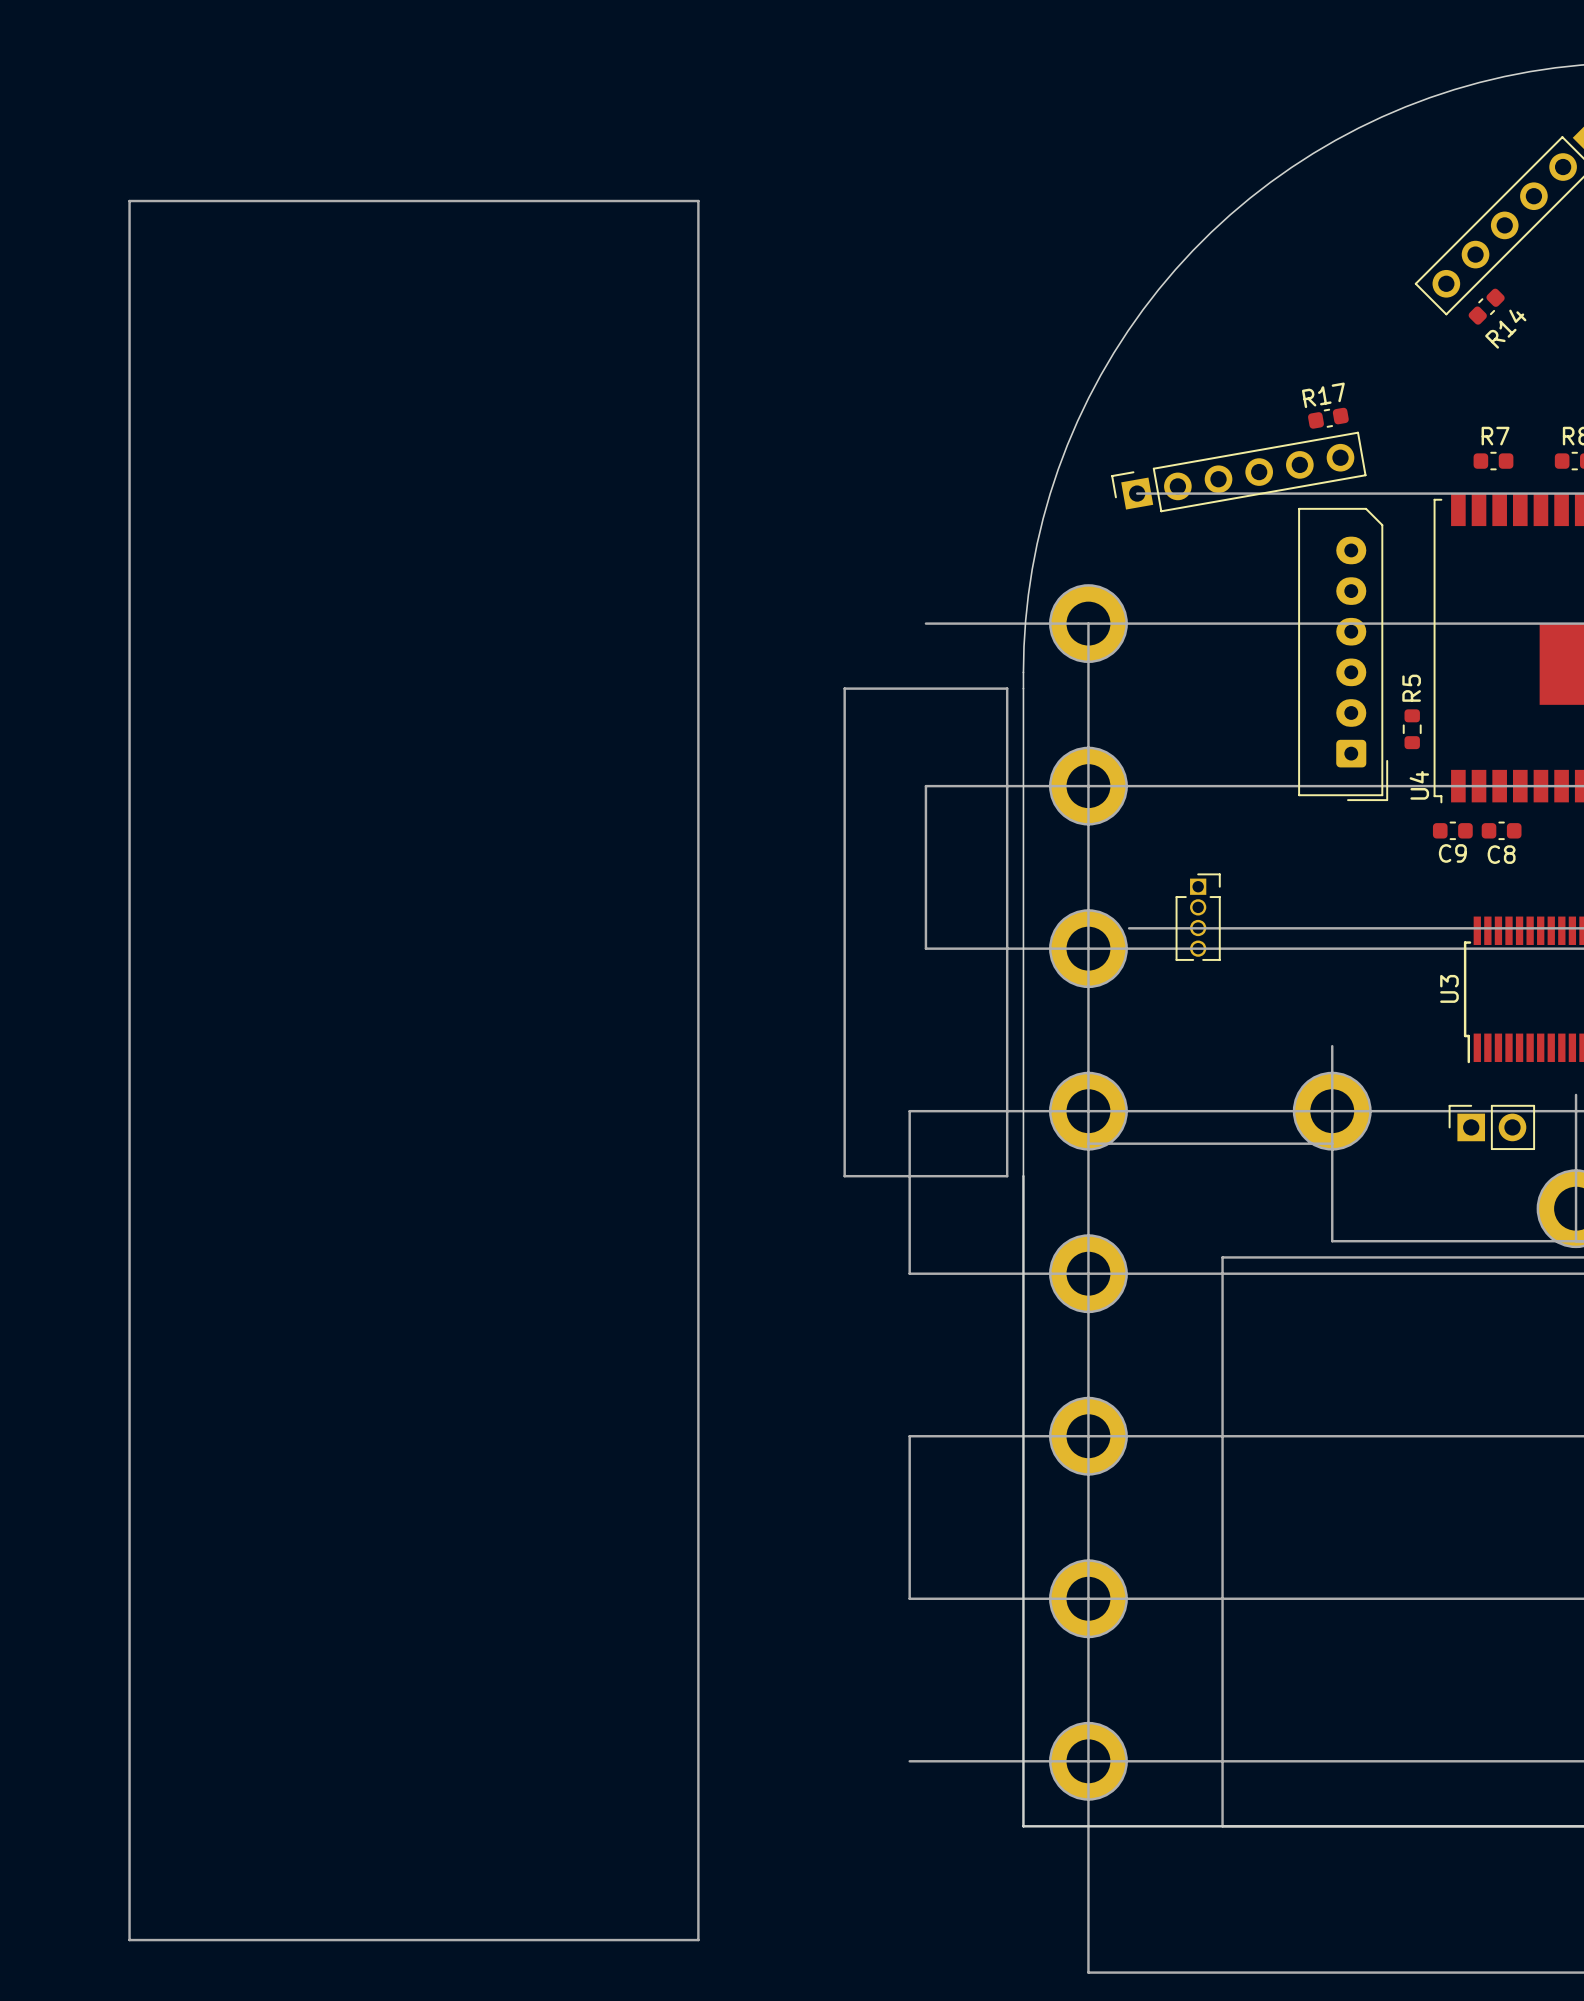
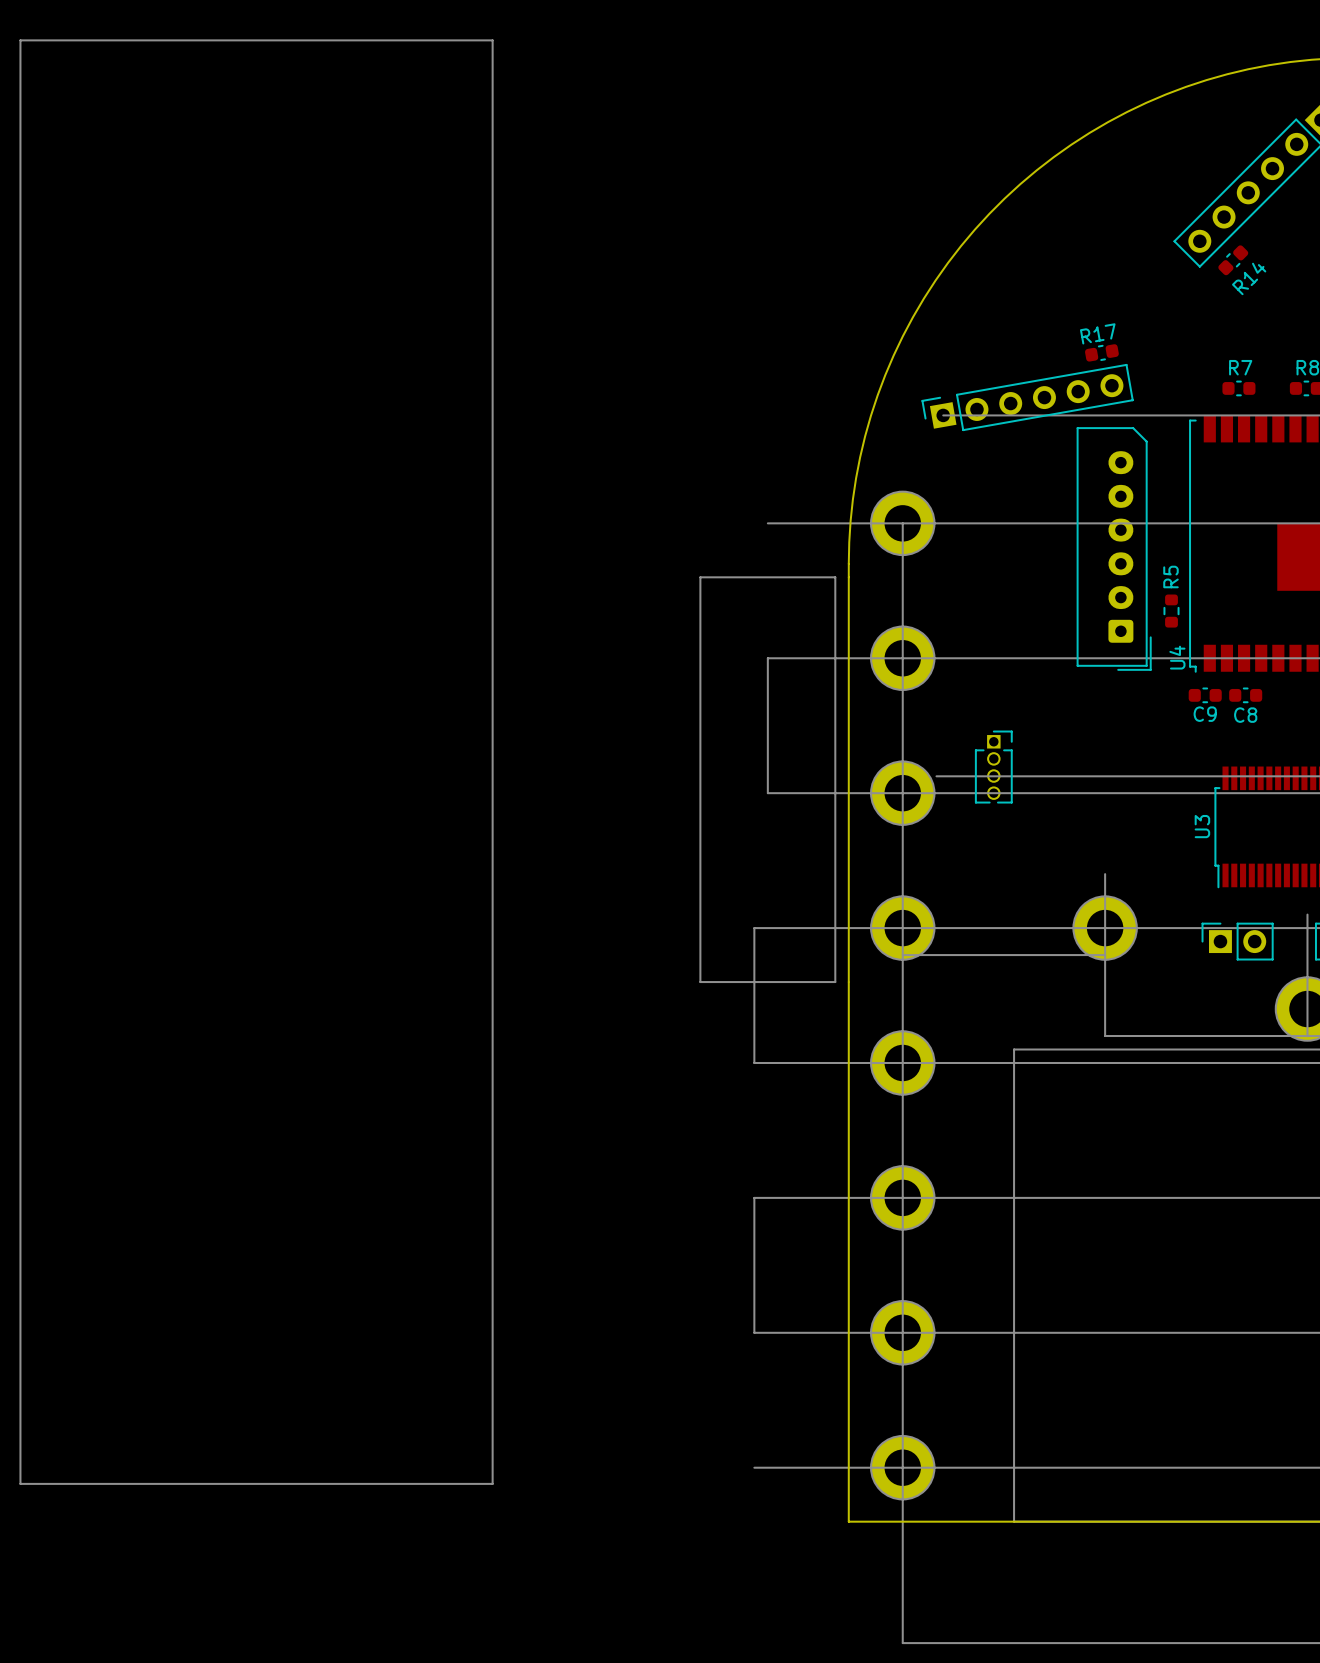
line: (129, 201) (698, 201) (698, 1940) (129, 1940) (129, 201) -> (20, 40) (492, 40) (492, 1483) (20, 1483) (20, 40)

